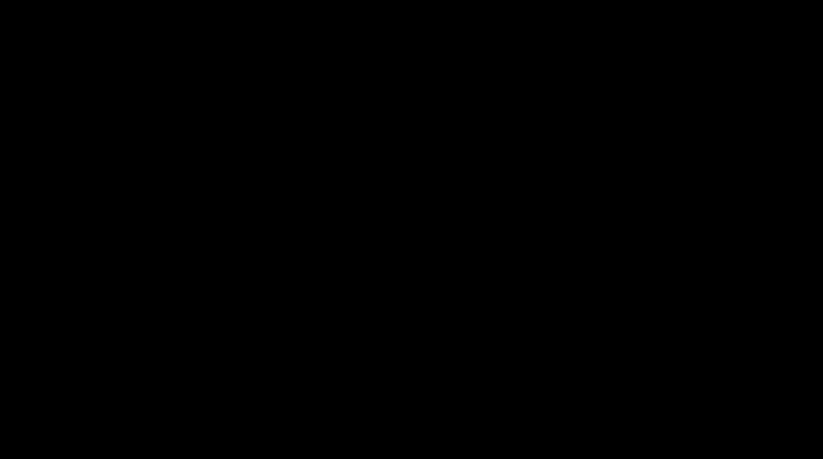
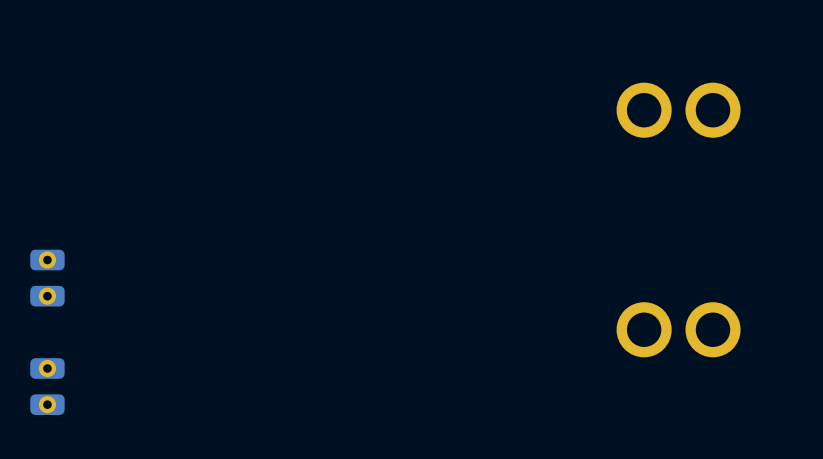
part: none -> (678, 110)
part: none -> (47, 278)
part: none -> (678, 329)
part: none -> (47, 386)

